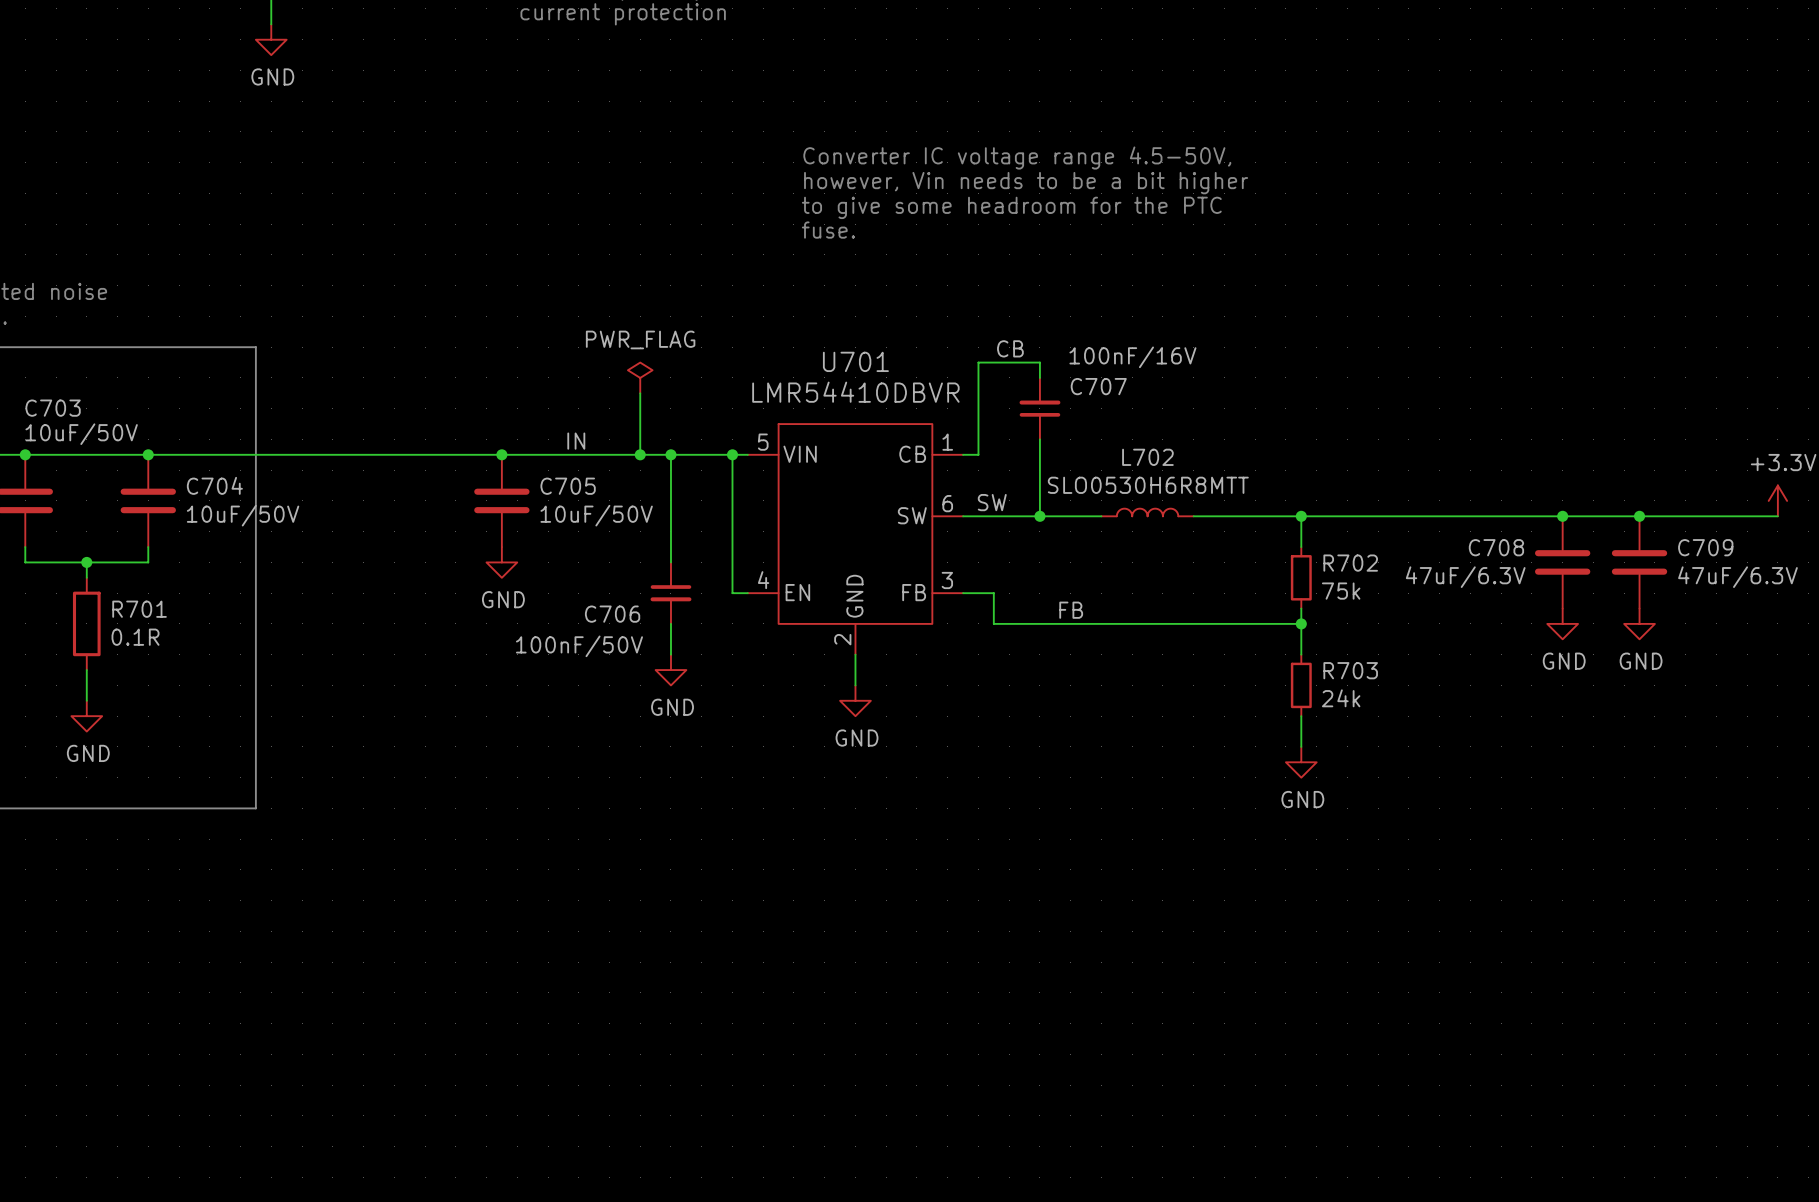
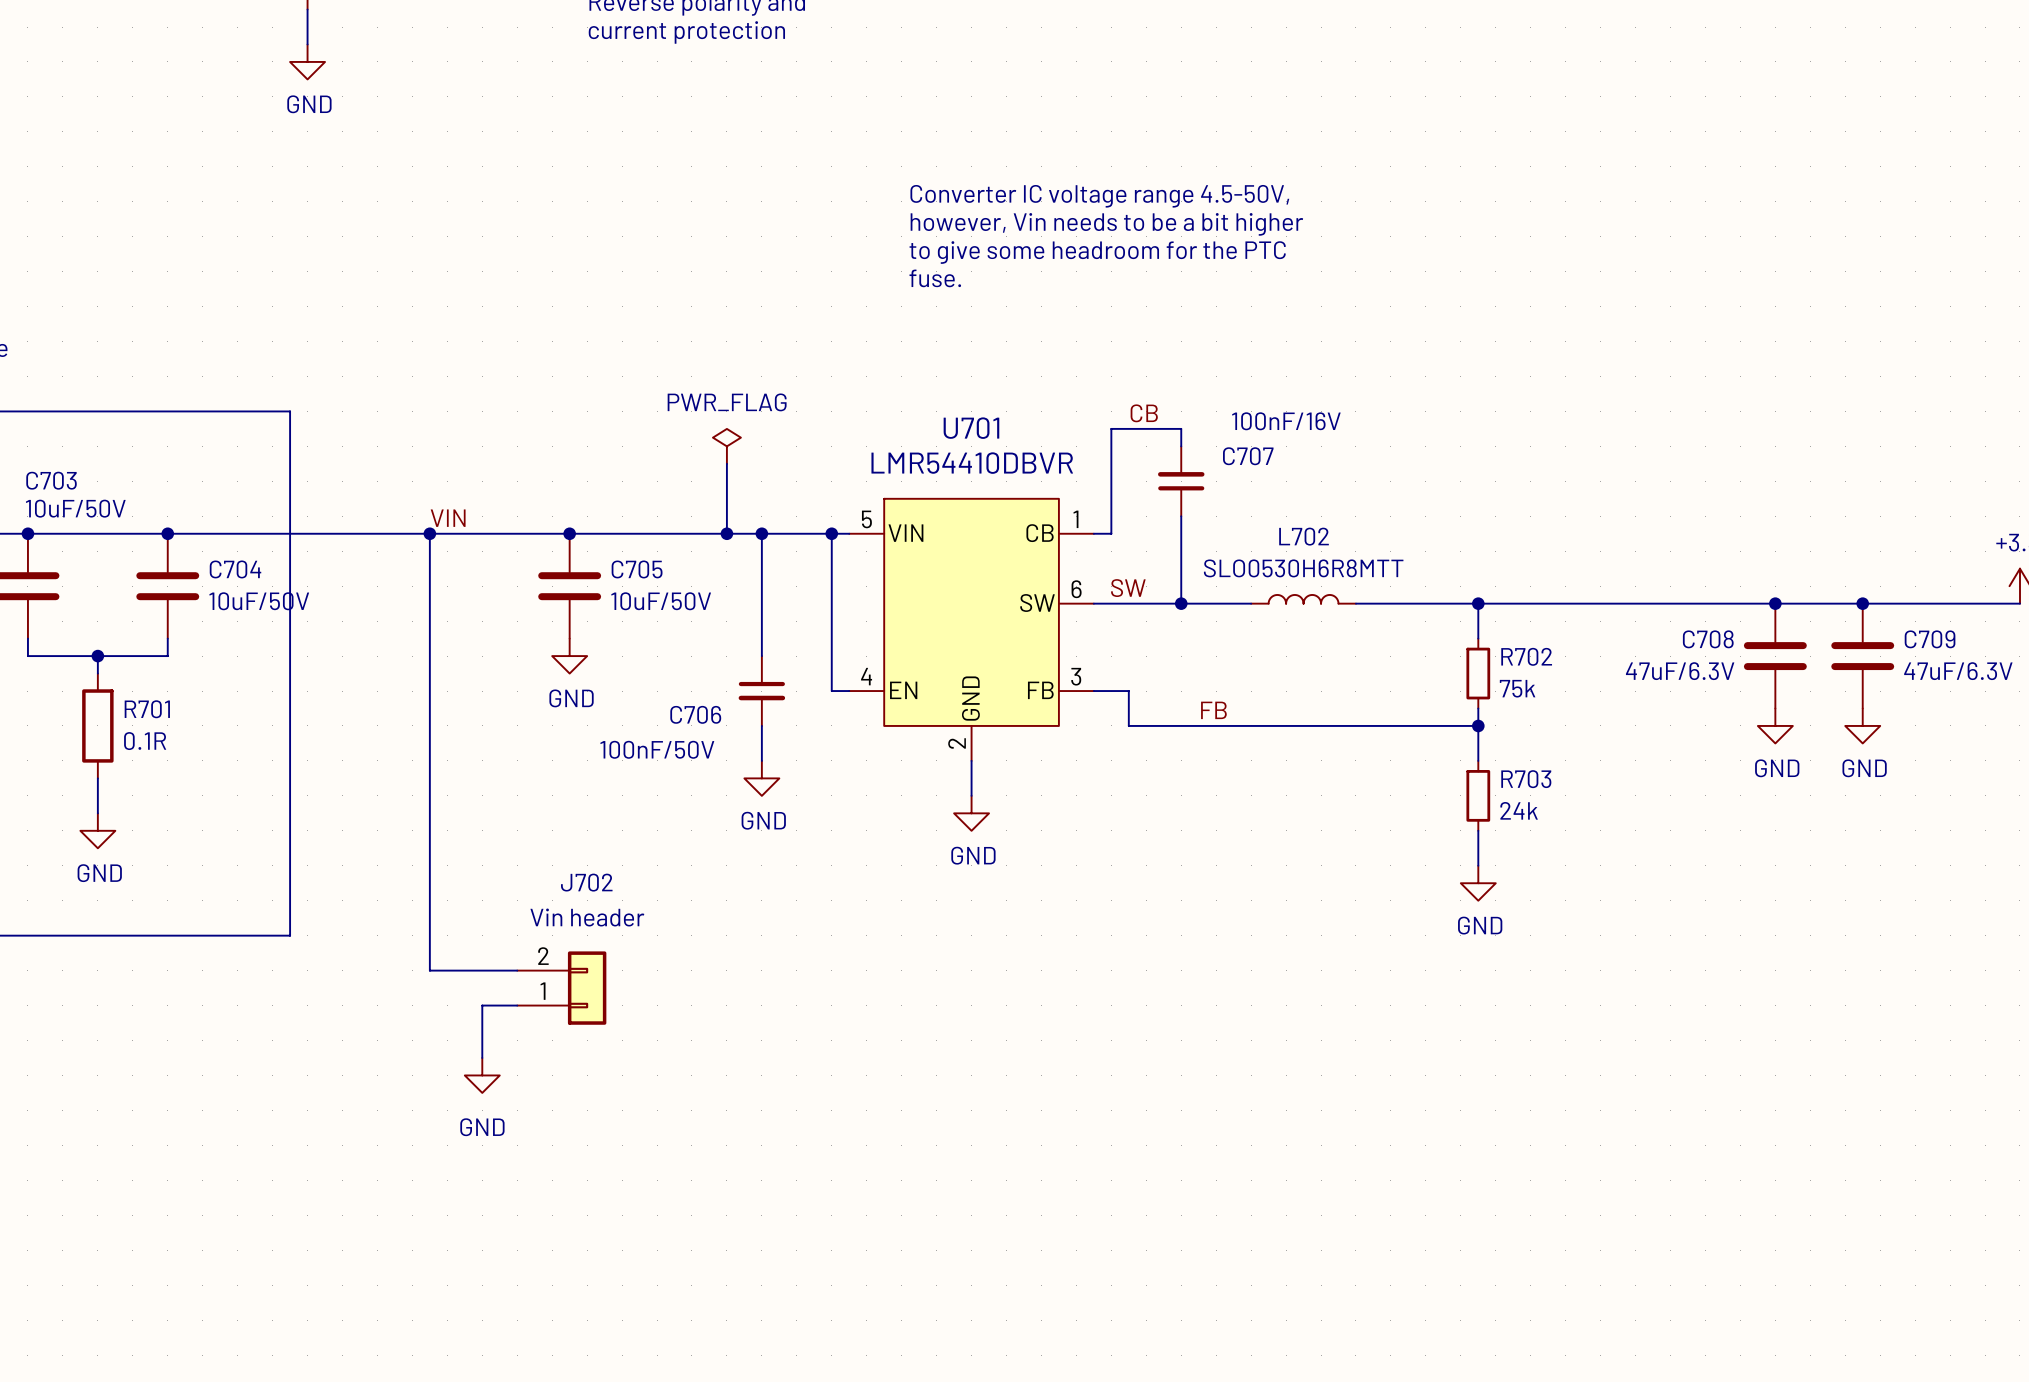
label: none -> VIN (448, 518)
label: IN (576, 441) -> none
wire: none -> (429, 533) (429, 970) (517, 970)
junction: none -> (429, 533)
J702: none -> Vin header (561, 988)
wire: none -> (517, 1005) (482, 1005) (482, 1057)
power symbol: none -> GND (482, 1075)

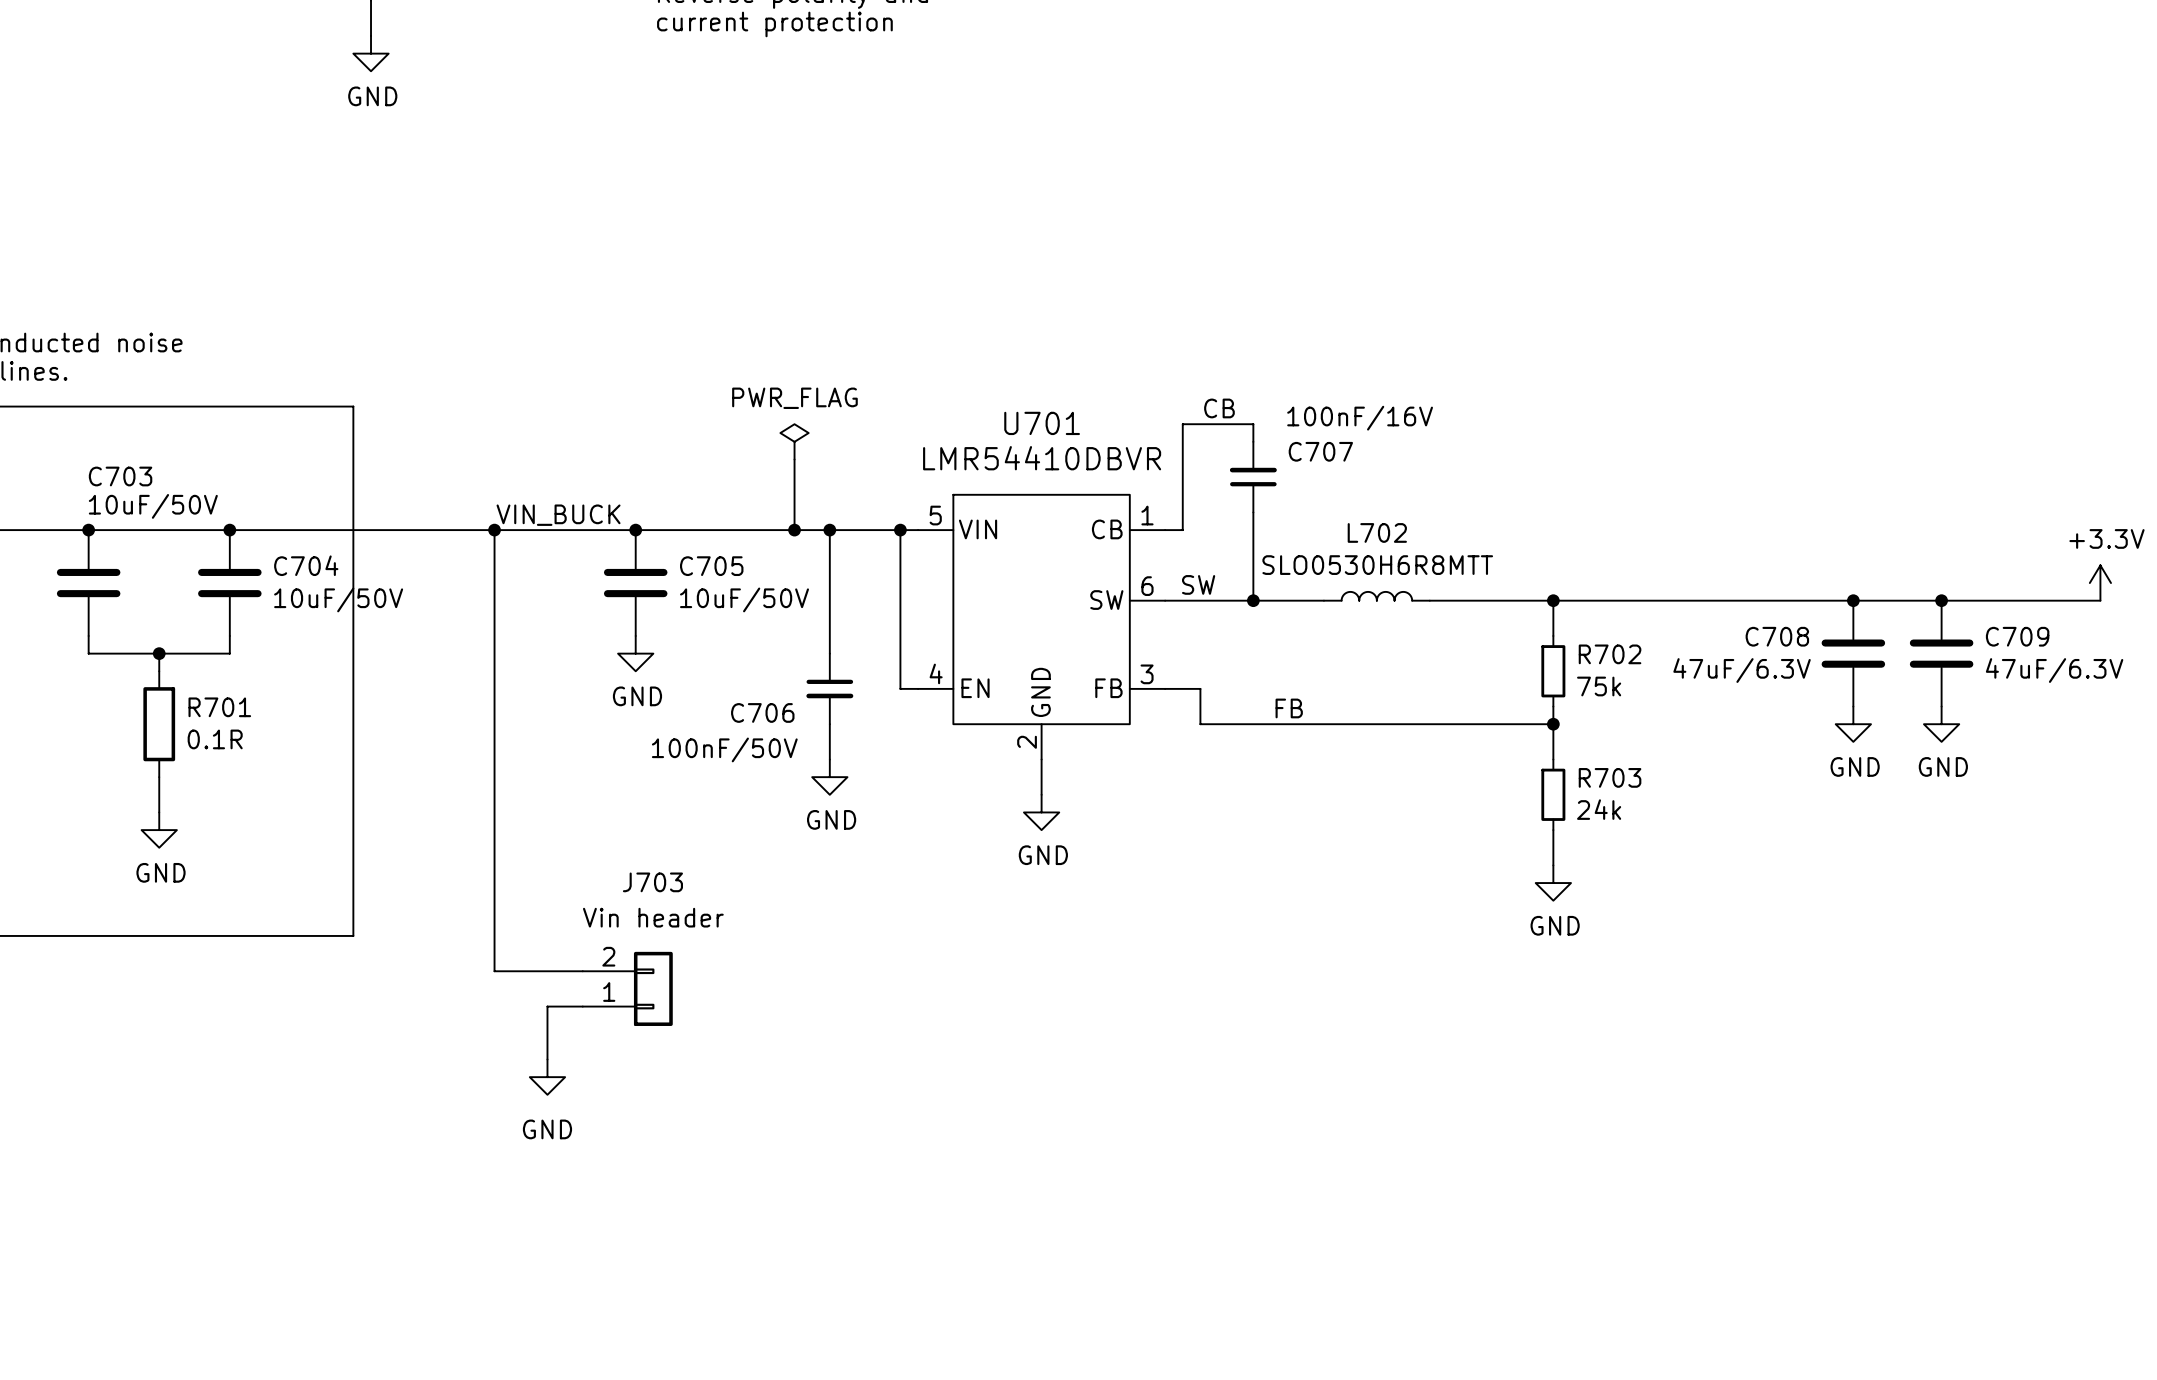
text: Converter IC voltage range 4.5-50V, (1099, 196) -> none
text: however, Vin needs to be a bit higher (1106, 224) -> none
text: to give some headroom for the PTC (1097, 252) -> none
text: fuse. (935, 278) -> none
label: VIN (448, 518) -> VIN_BUCK (558, 515)
J702 name: J702 (586, 882) -> J703 (652, 882)

